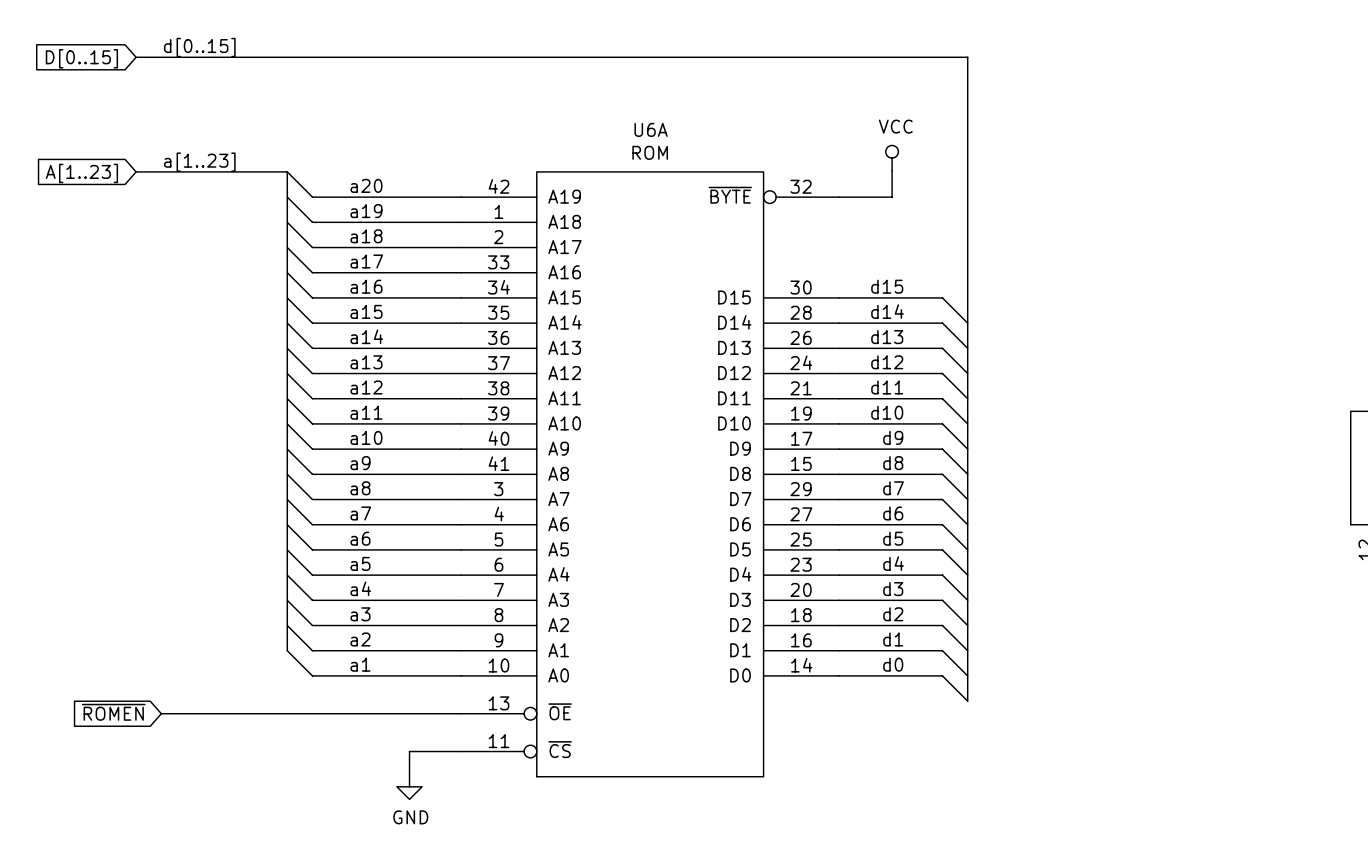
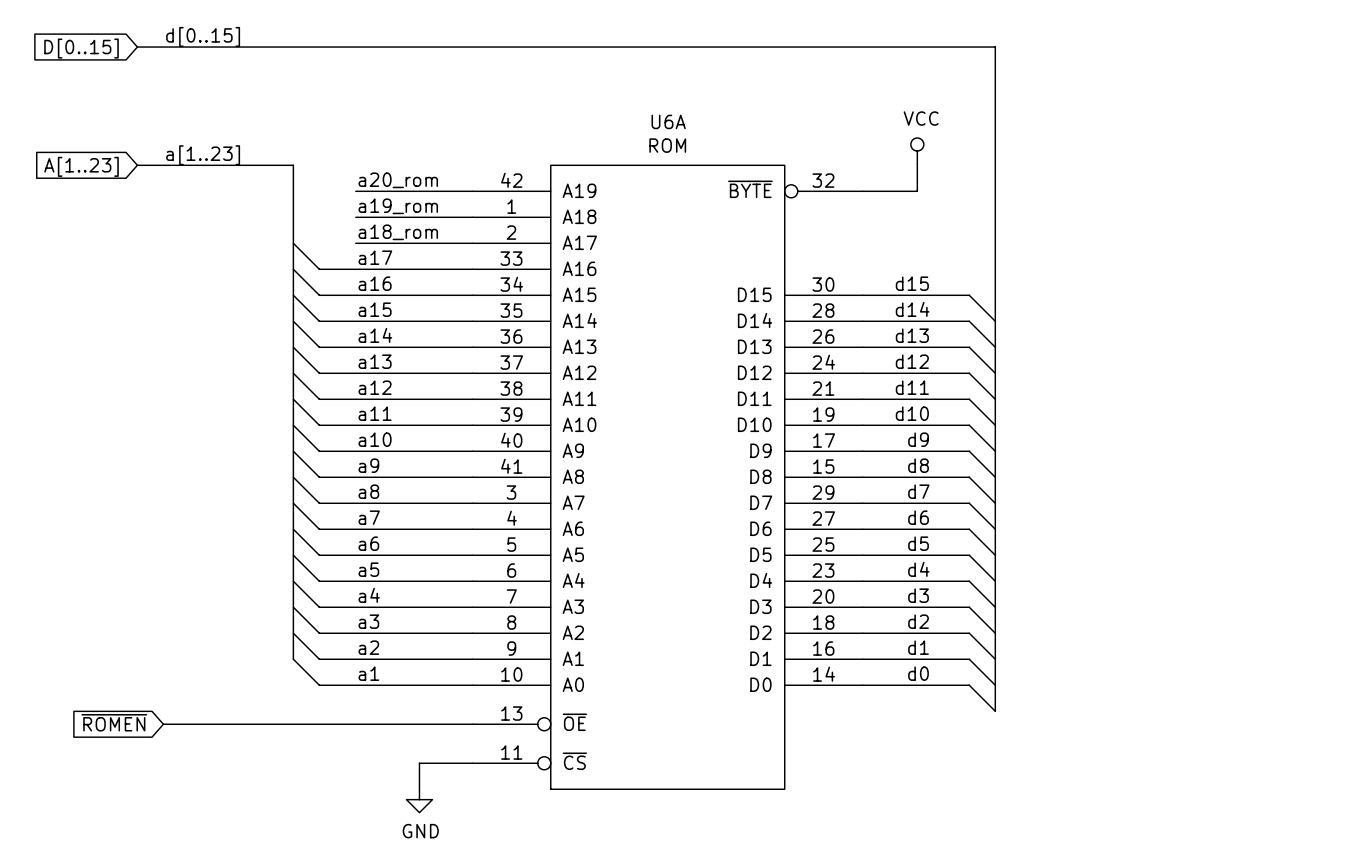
wire: (287, 171) (312, 197) (347, 197) -> none
label: a20 (366, 185) -> a20_rom (398, 180)
wire: (287, 197) (312, 222) (347, 222) -> none
label: a19 (366, 211) -> a19_rom (398, 206)
wire: (287, 222) (312, 247) (347, 247) -> none
label: a18 (366, 236) -> a18_rom (398, 232)

